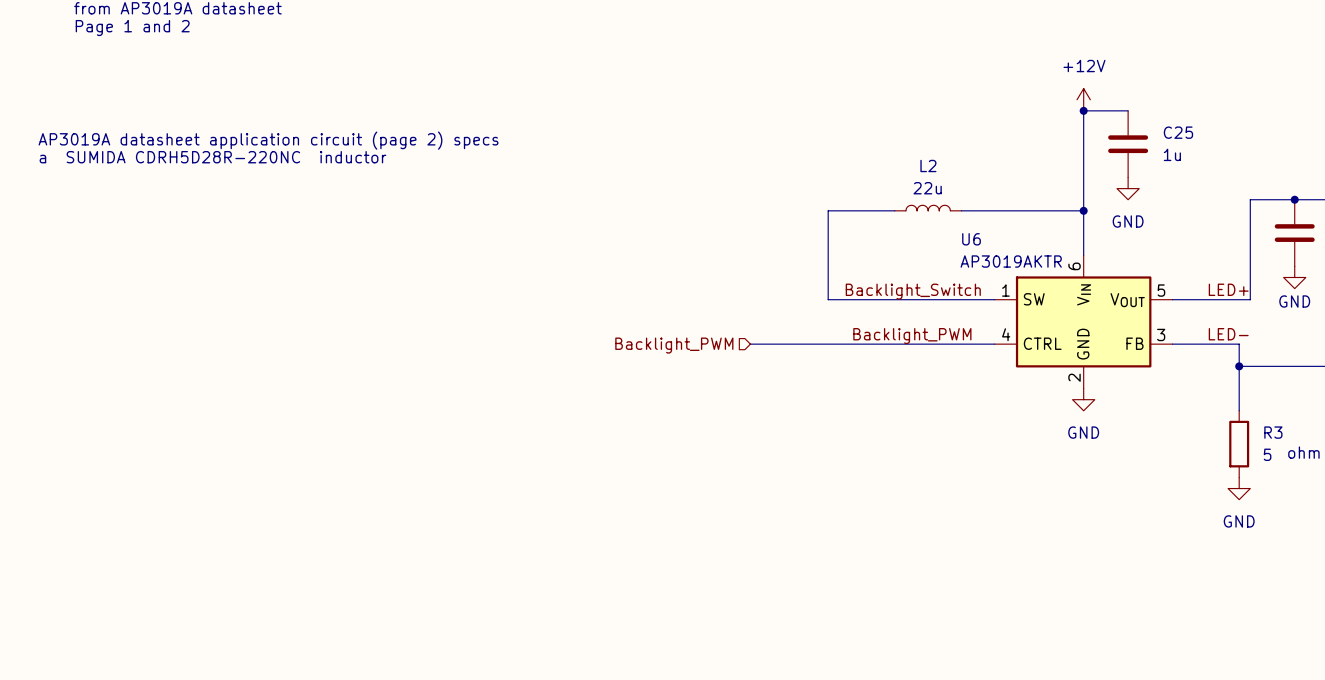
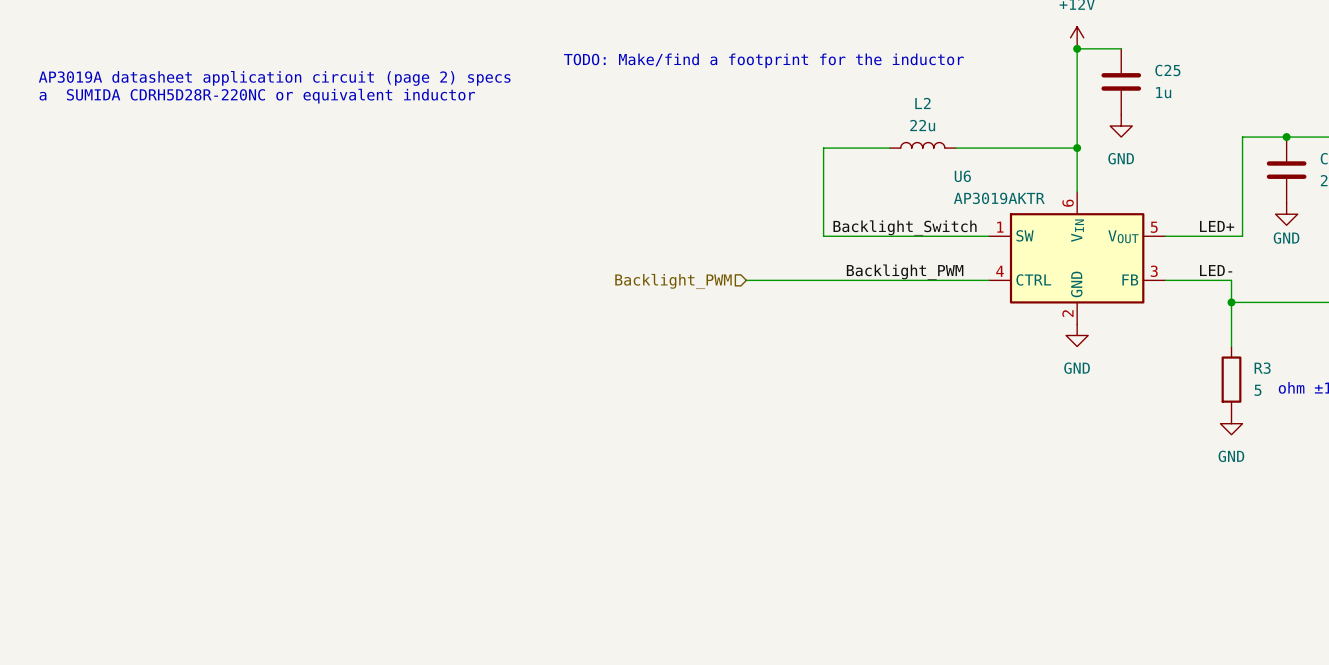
text: none -> TODO: Make/find a footprint for the inductor (763, 60)
text: a SUMIDA CDRH5D28R-220NC inductor (212, 157) -> a SUMIDA CDRH5D28R-220NC or equivalent inductor (257, 96)

